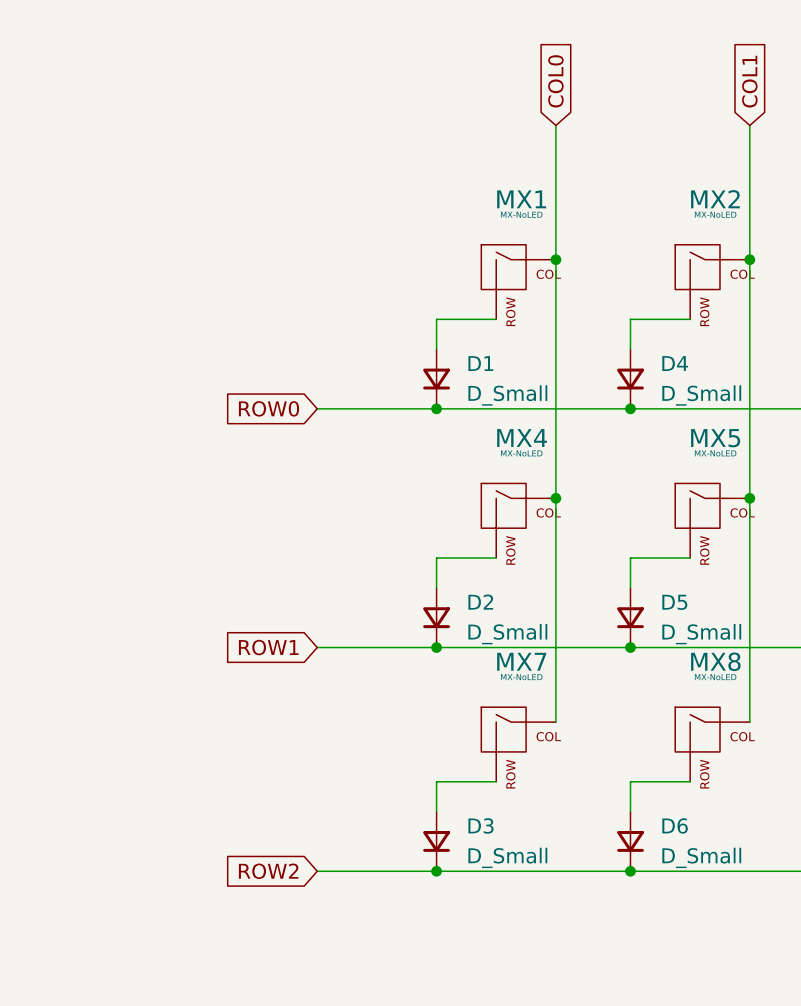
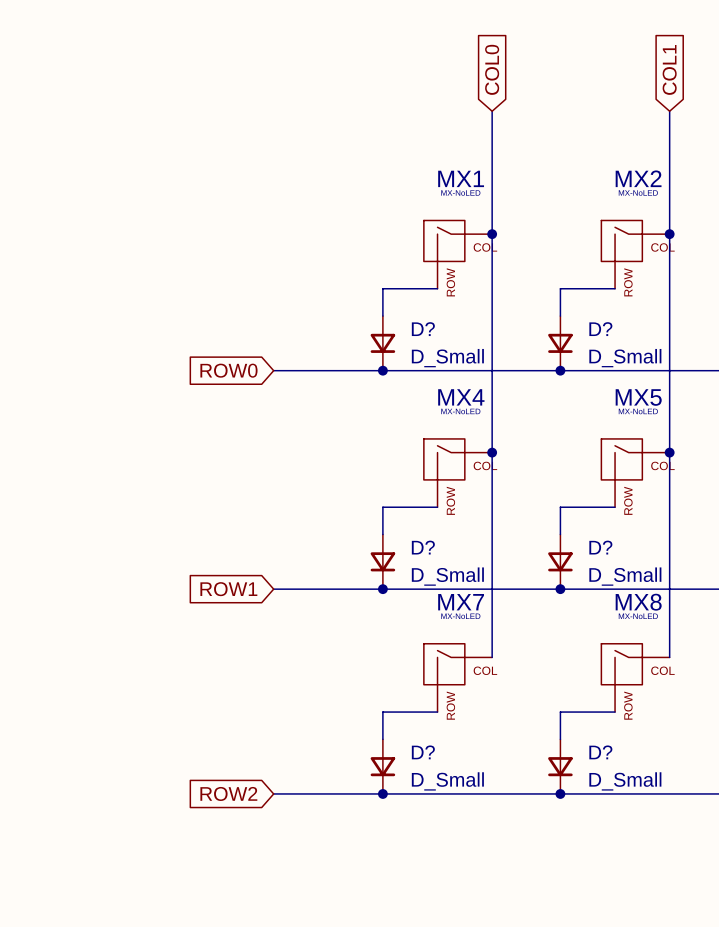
D1 name: D1 (480, 363) -> D? (423, 329)
D4 name: D4 (675, 363) -> D? (600, 329)
D2 name: D2 (480, 602) -> D? (423, 547)
D5 name: D5 (674, 602) -> D? (600, 547)
D3 name: D3 (480, 825) -> D? (423, 752)
D6 name: D6 (675, 825) -> D? (600, 752)

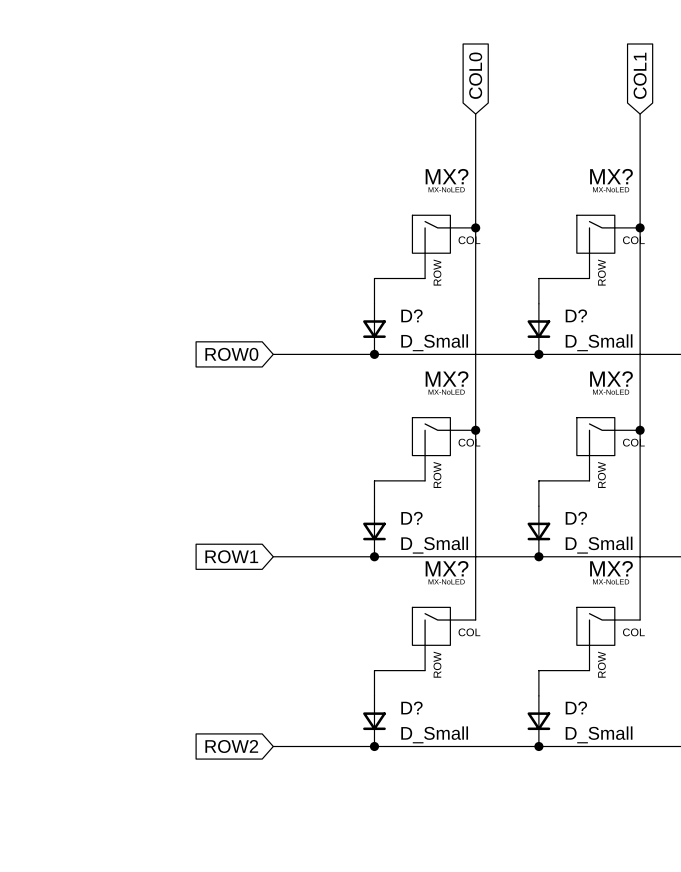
MX1 name: MX1 (461, 178) -> MX? (447, 176)
MX2 name: MX2 (638, 178) -> MX? (611, 176)
MX4 name: MX4 (461, 397) -> MX? (447, 379)
MX5 name: MX5 (638, 397) -> MX? (611, 379)
MX7 name: MX7 (461, 602) -> MX? (447, 568)
MX8 name: MX8 (638, 602) -> MX? (611, 568)

